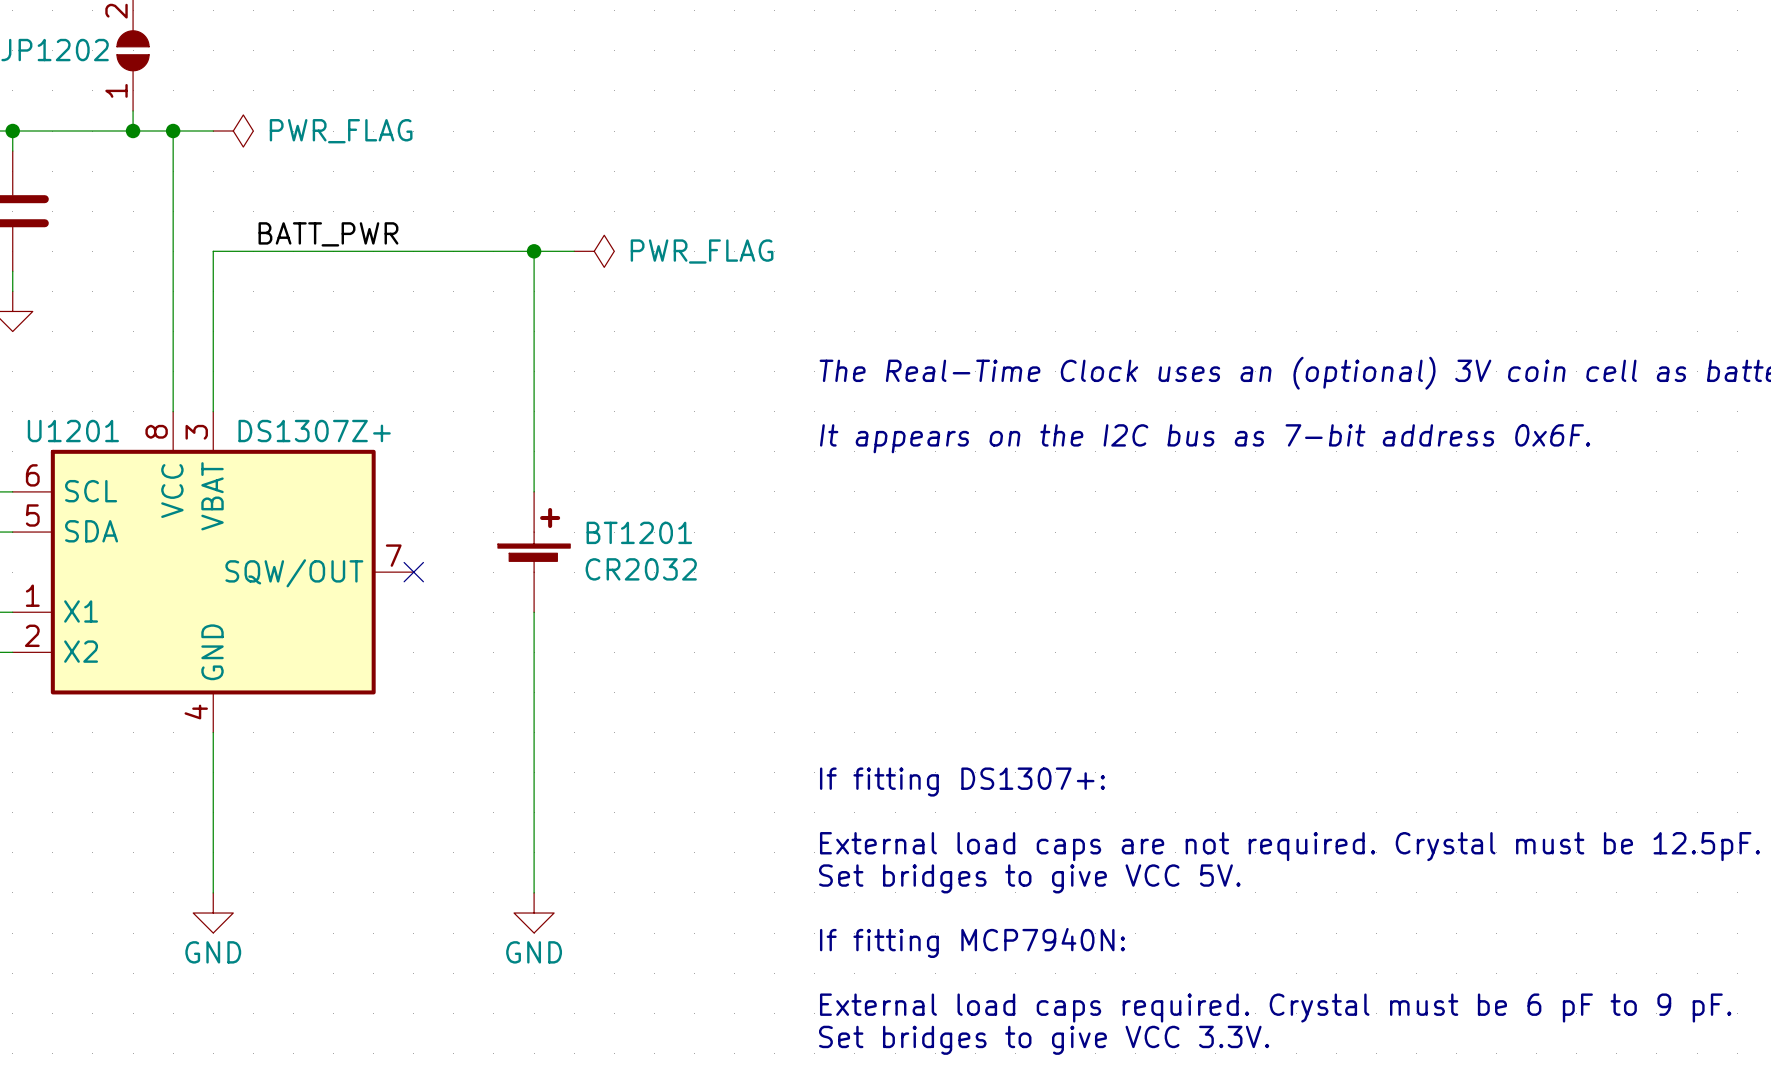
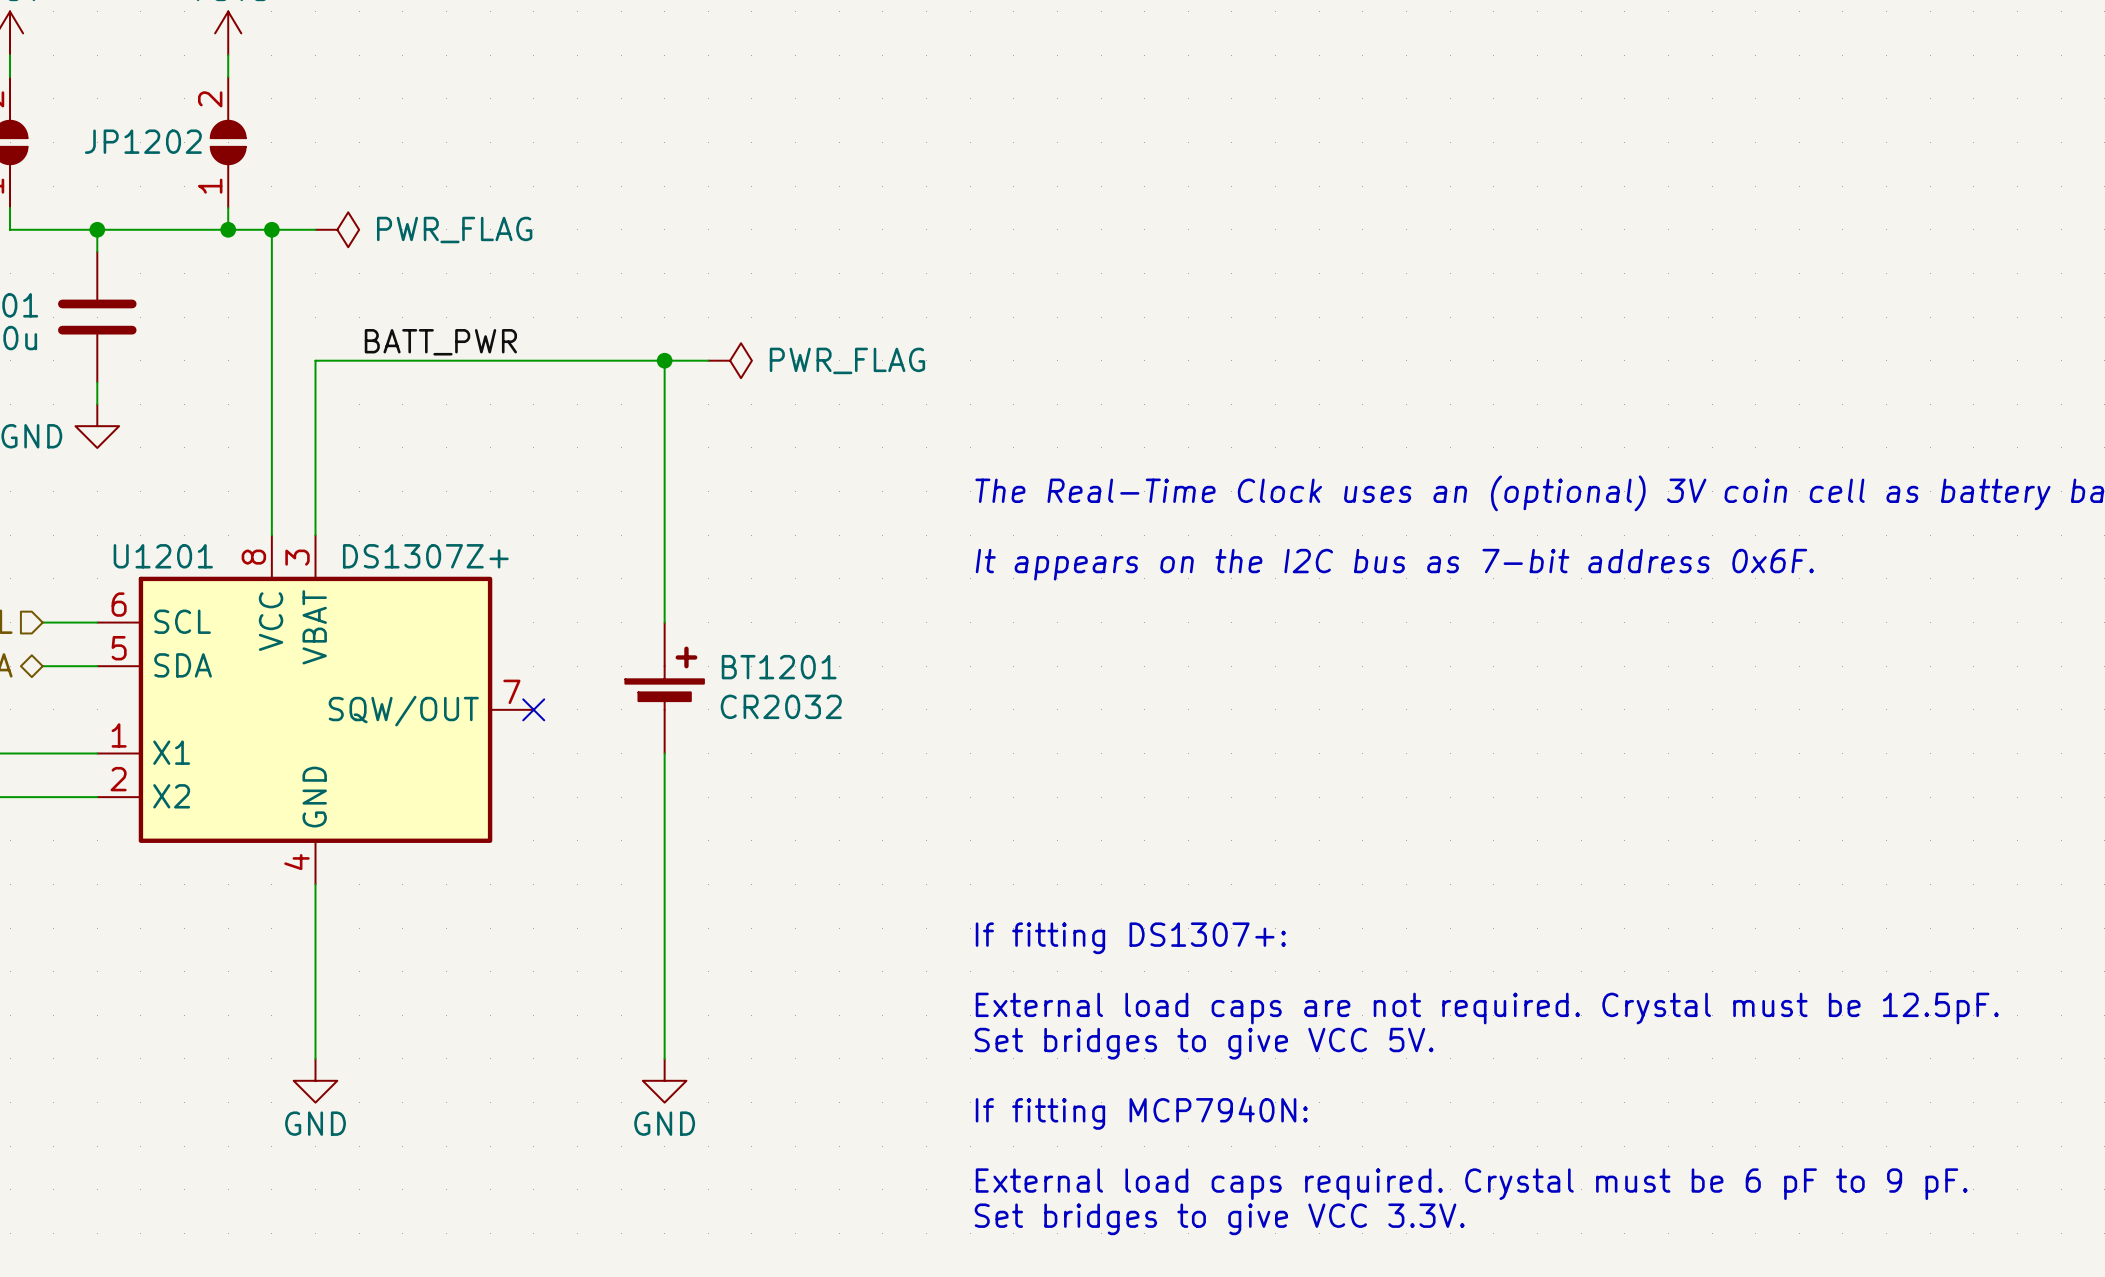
BT1201 symbol: [497, 491, 571, 613] -> [625, 622, 704, 754]

